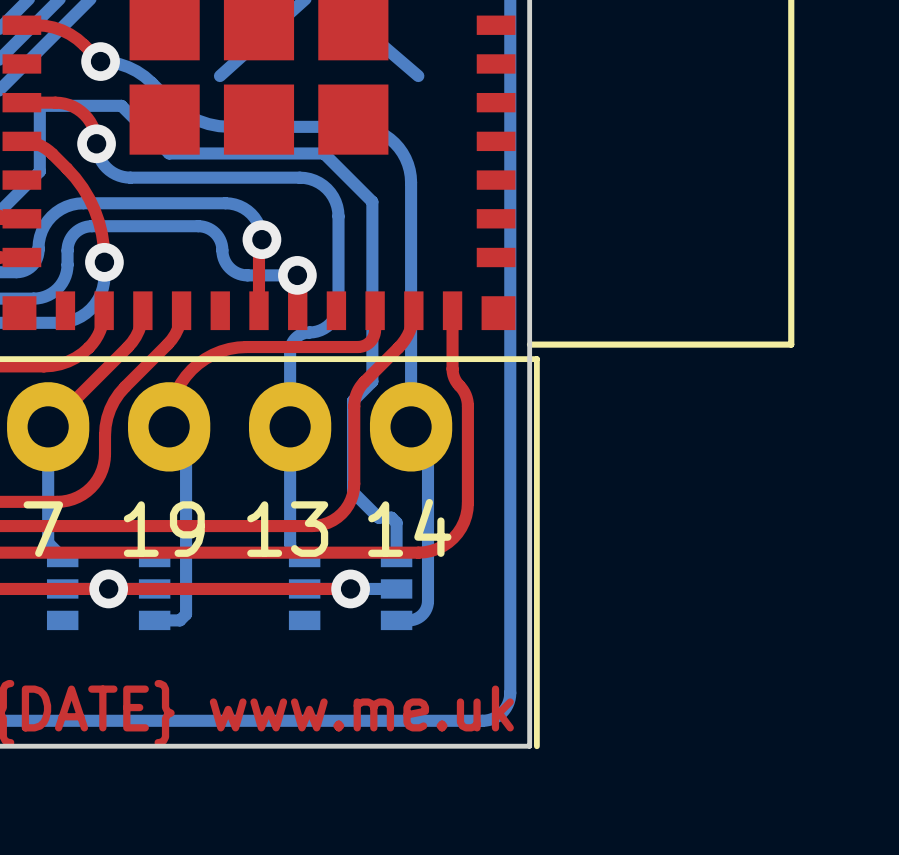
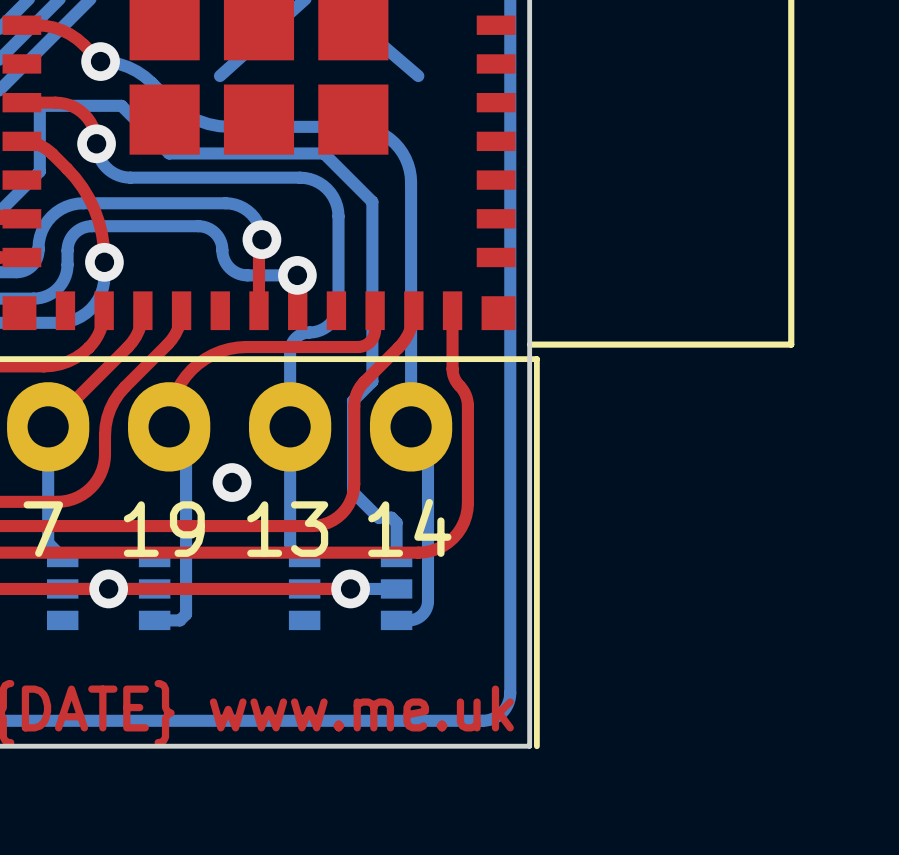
via: none -> (232, 482)

